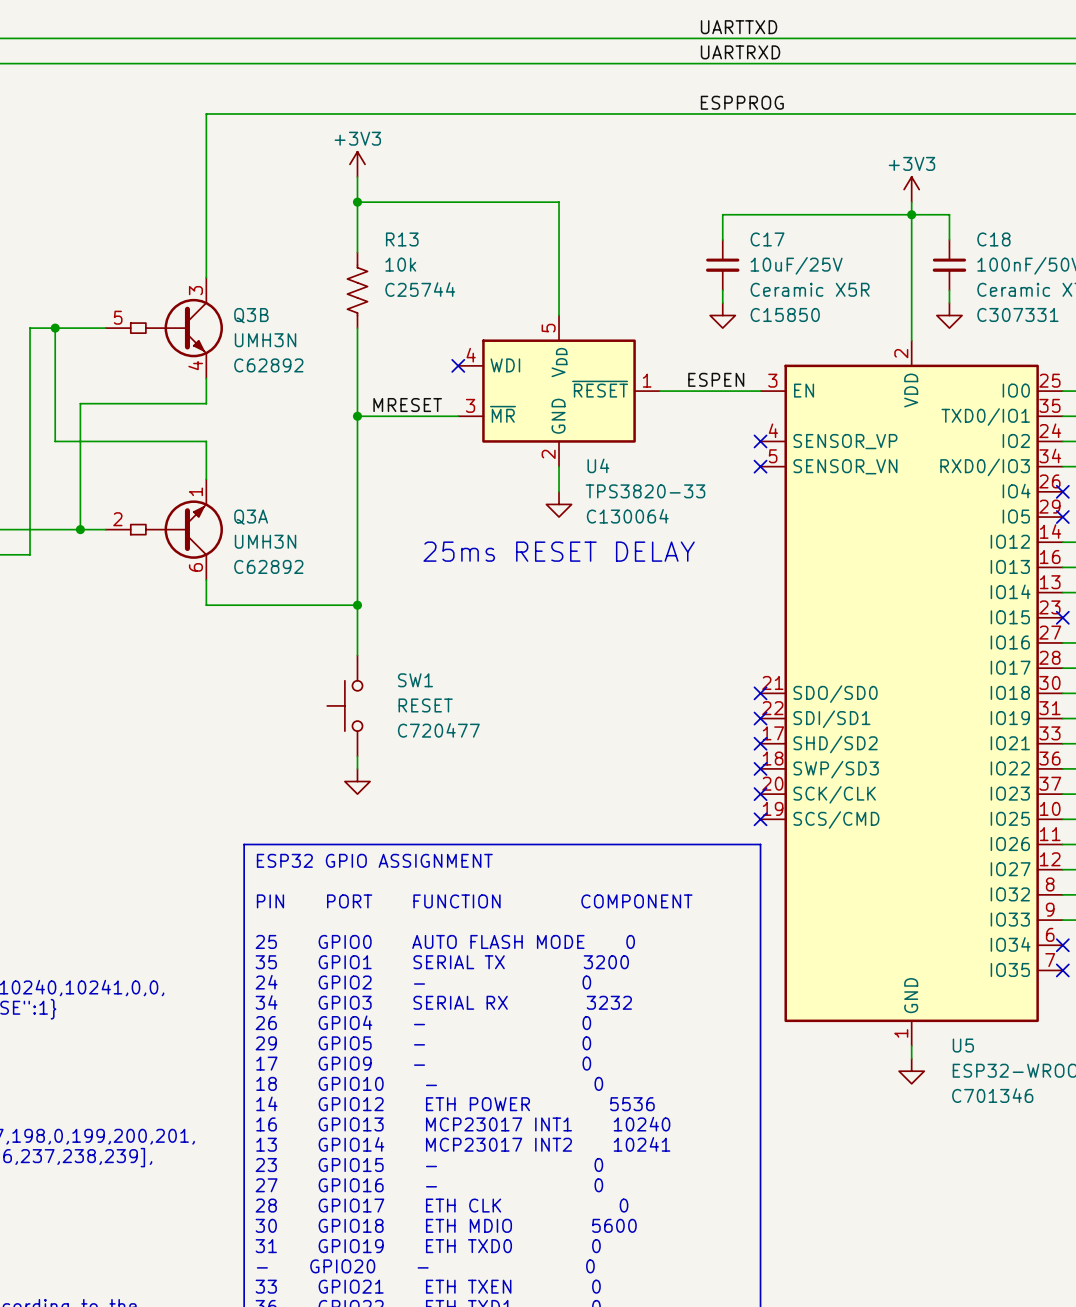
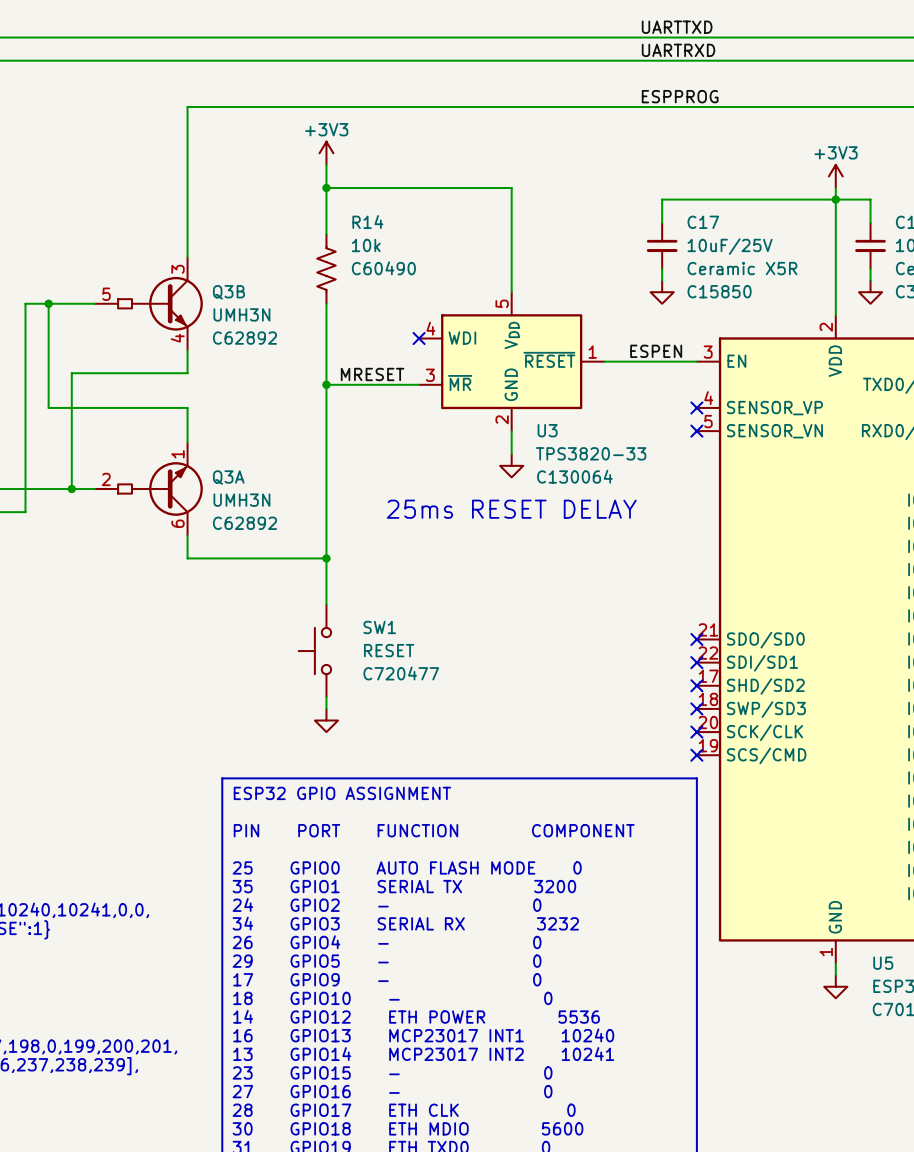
R13 name: R13 (402, 239) -> R14 (367, 222)
R13 text: C25744 (420, 289) -> C60490 (383, 268)
U4 name: U4 (598, 465) -> U3 (547, 430)

